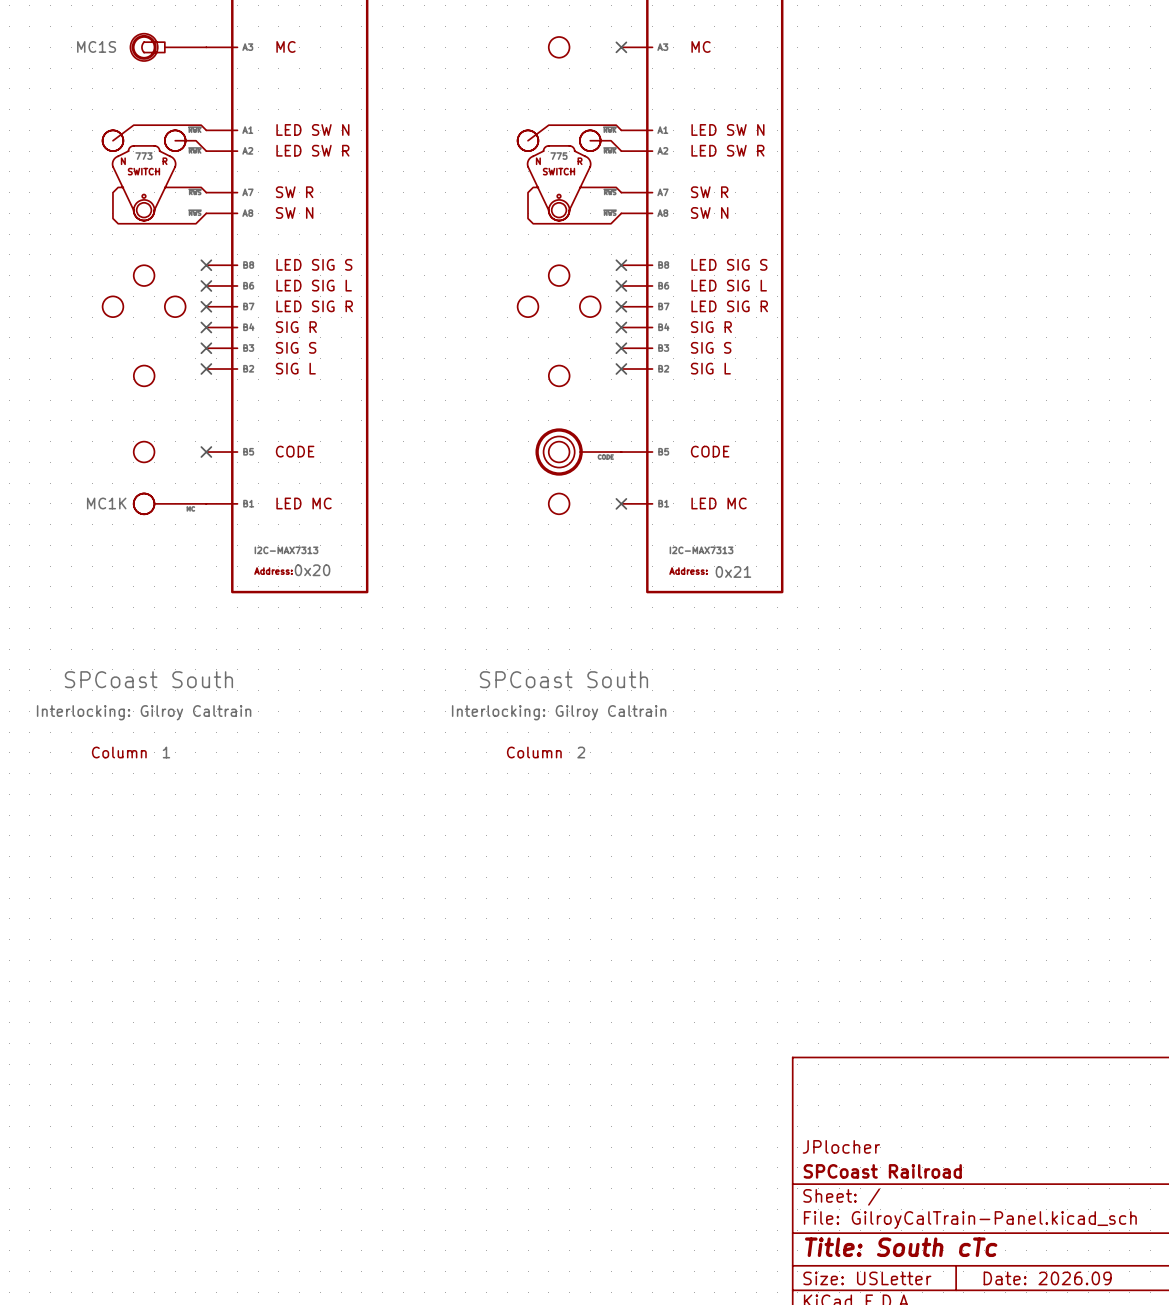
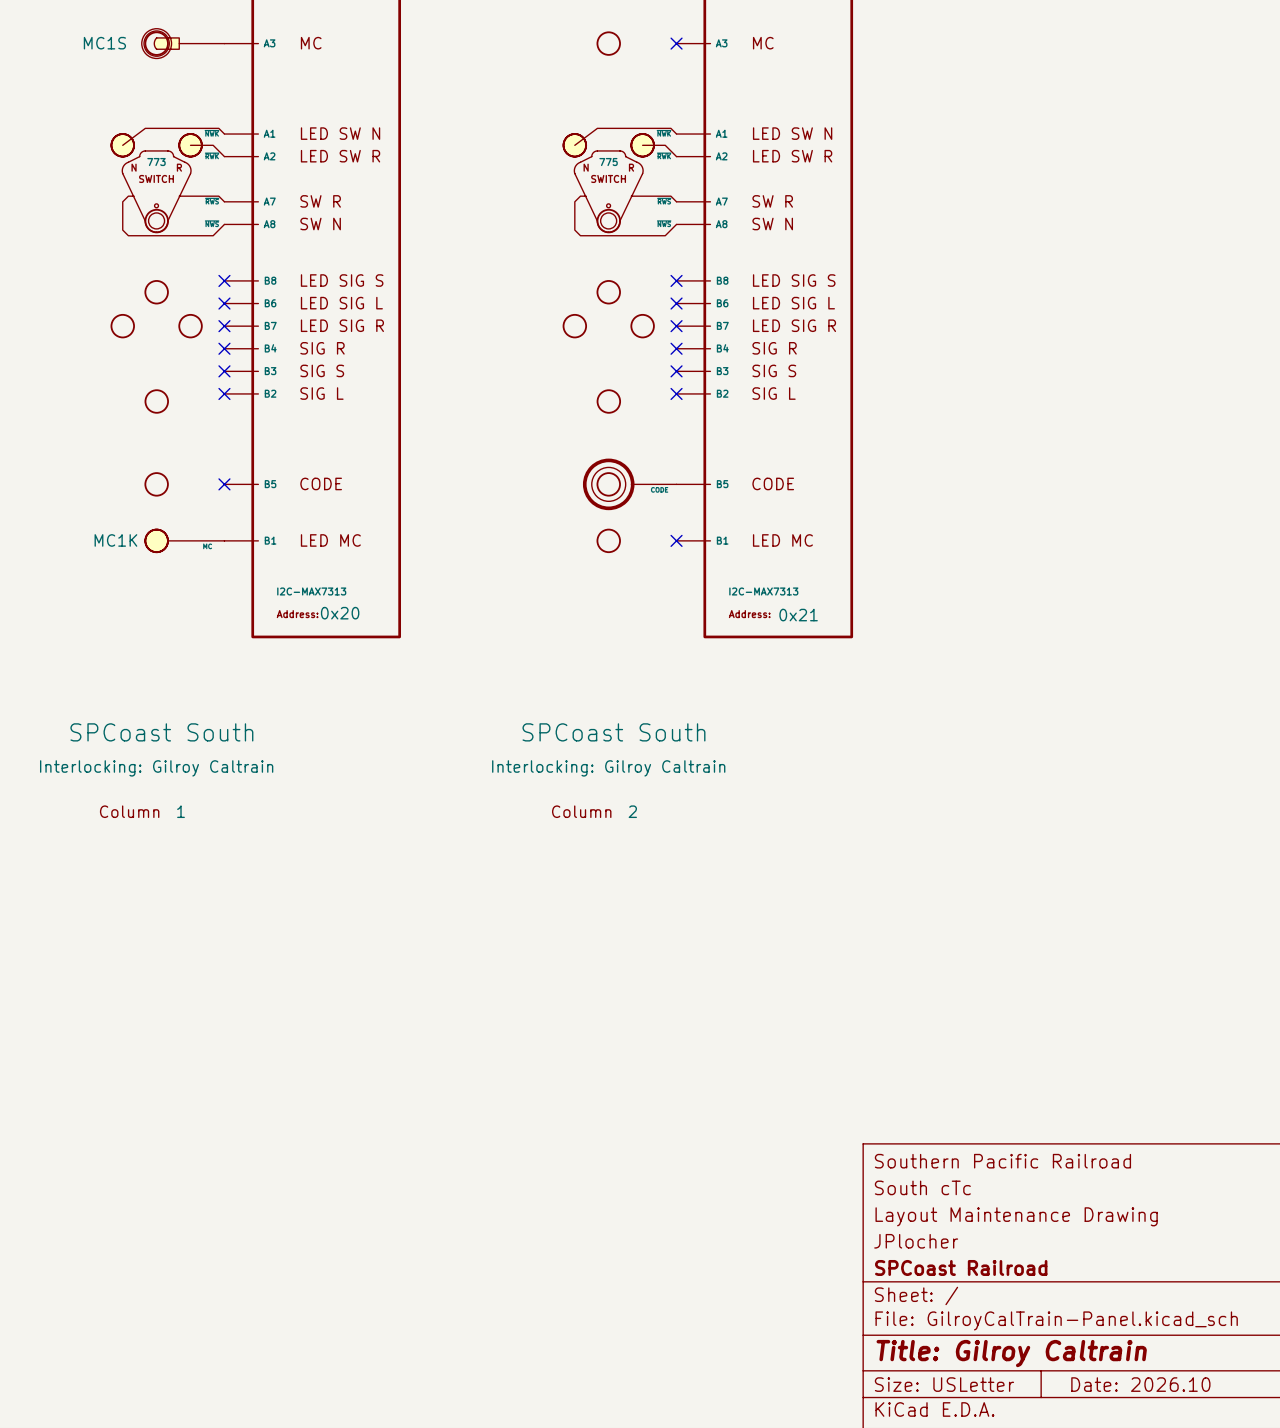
title block: none -> Southern Pacific Railroad (1002, 1161)
title block: none -> South cTc (922, 1187)
title block: none -> Layout Maintenance Drawing (1016, 1216)
title block: Title: South cTc (901, 1247) -> Title: Gilroy Caltrain (1011, 1353)
title block: Date: 2026.09 (1047, 1278) -> Date: 2026.10 (1140, 1384)

